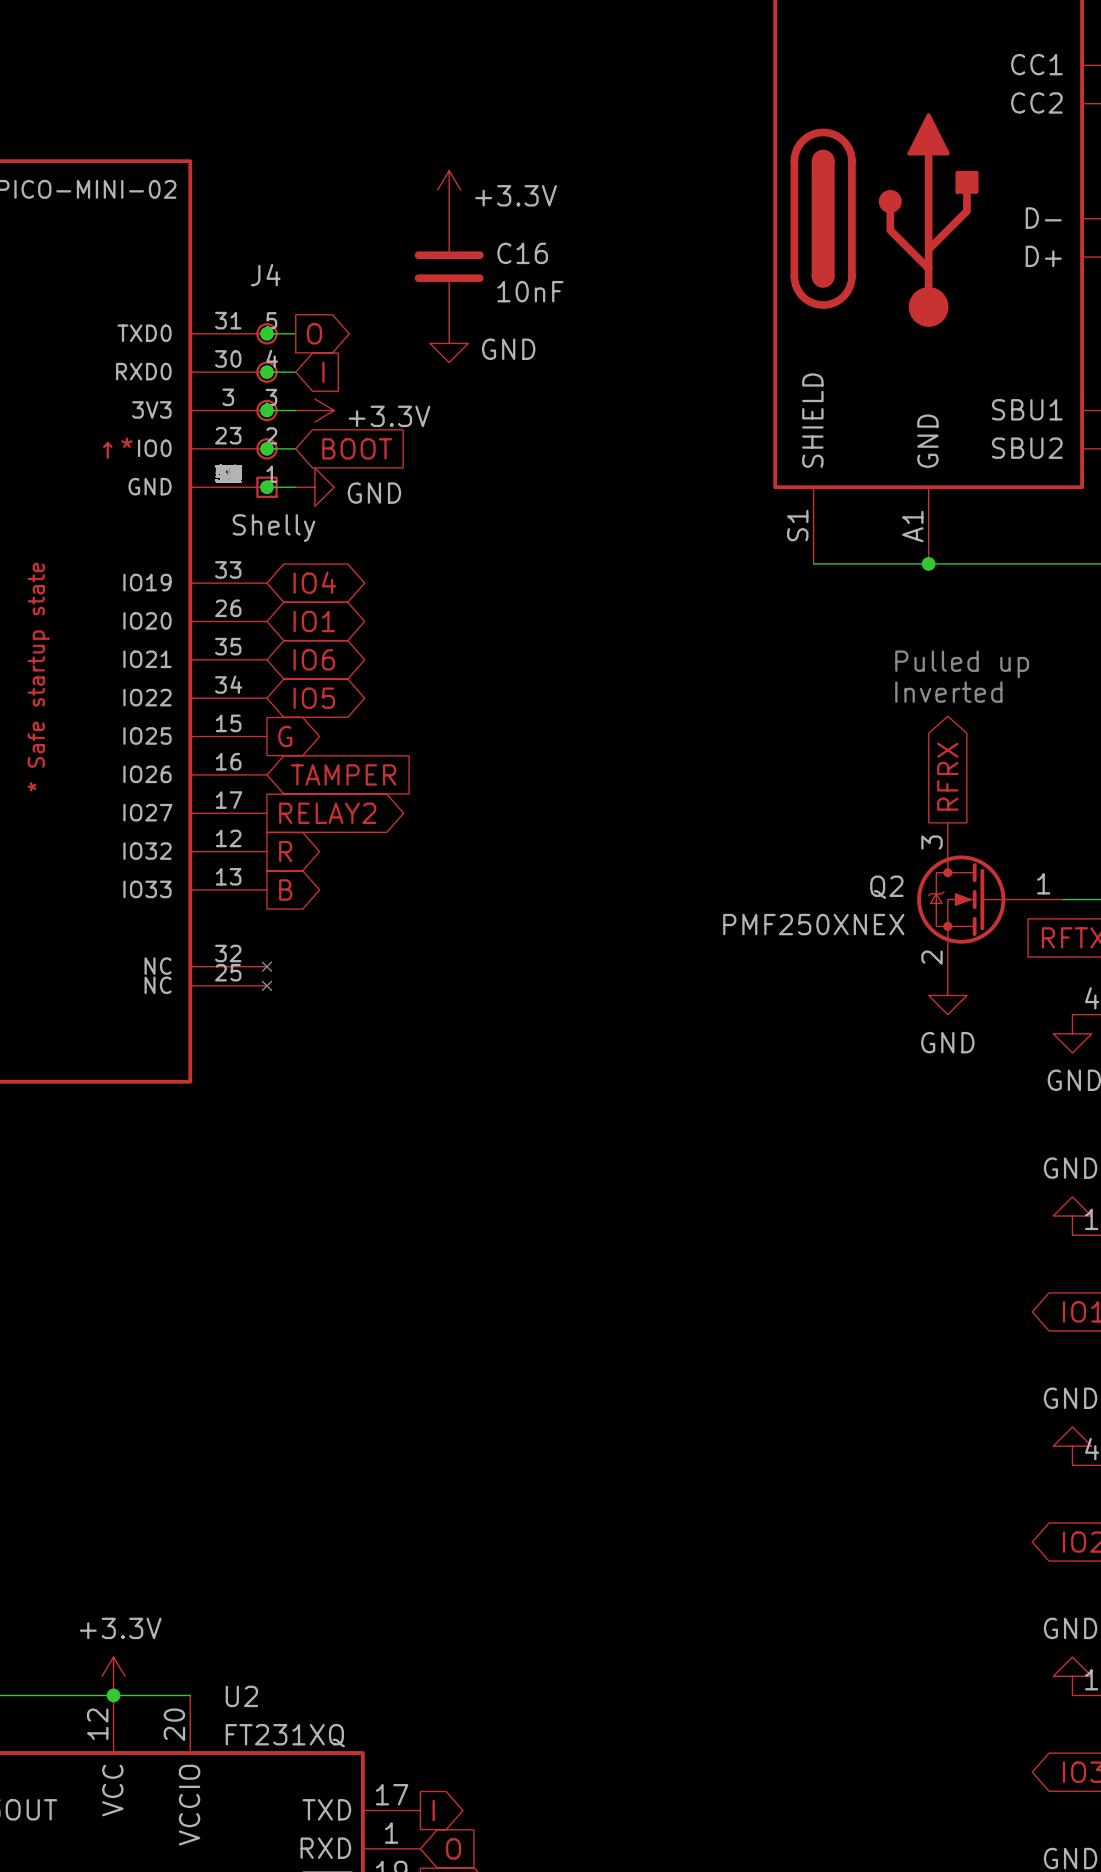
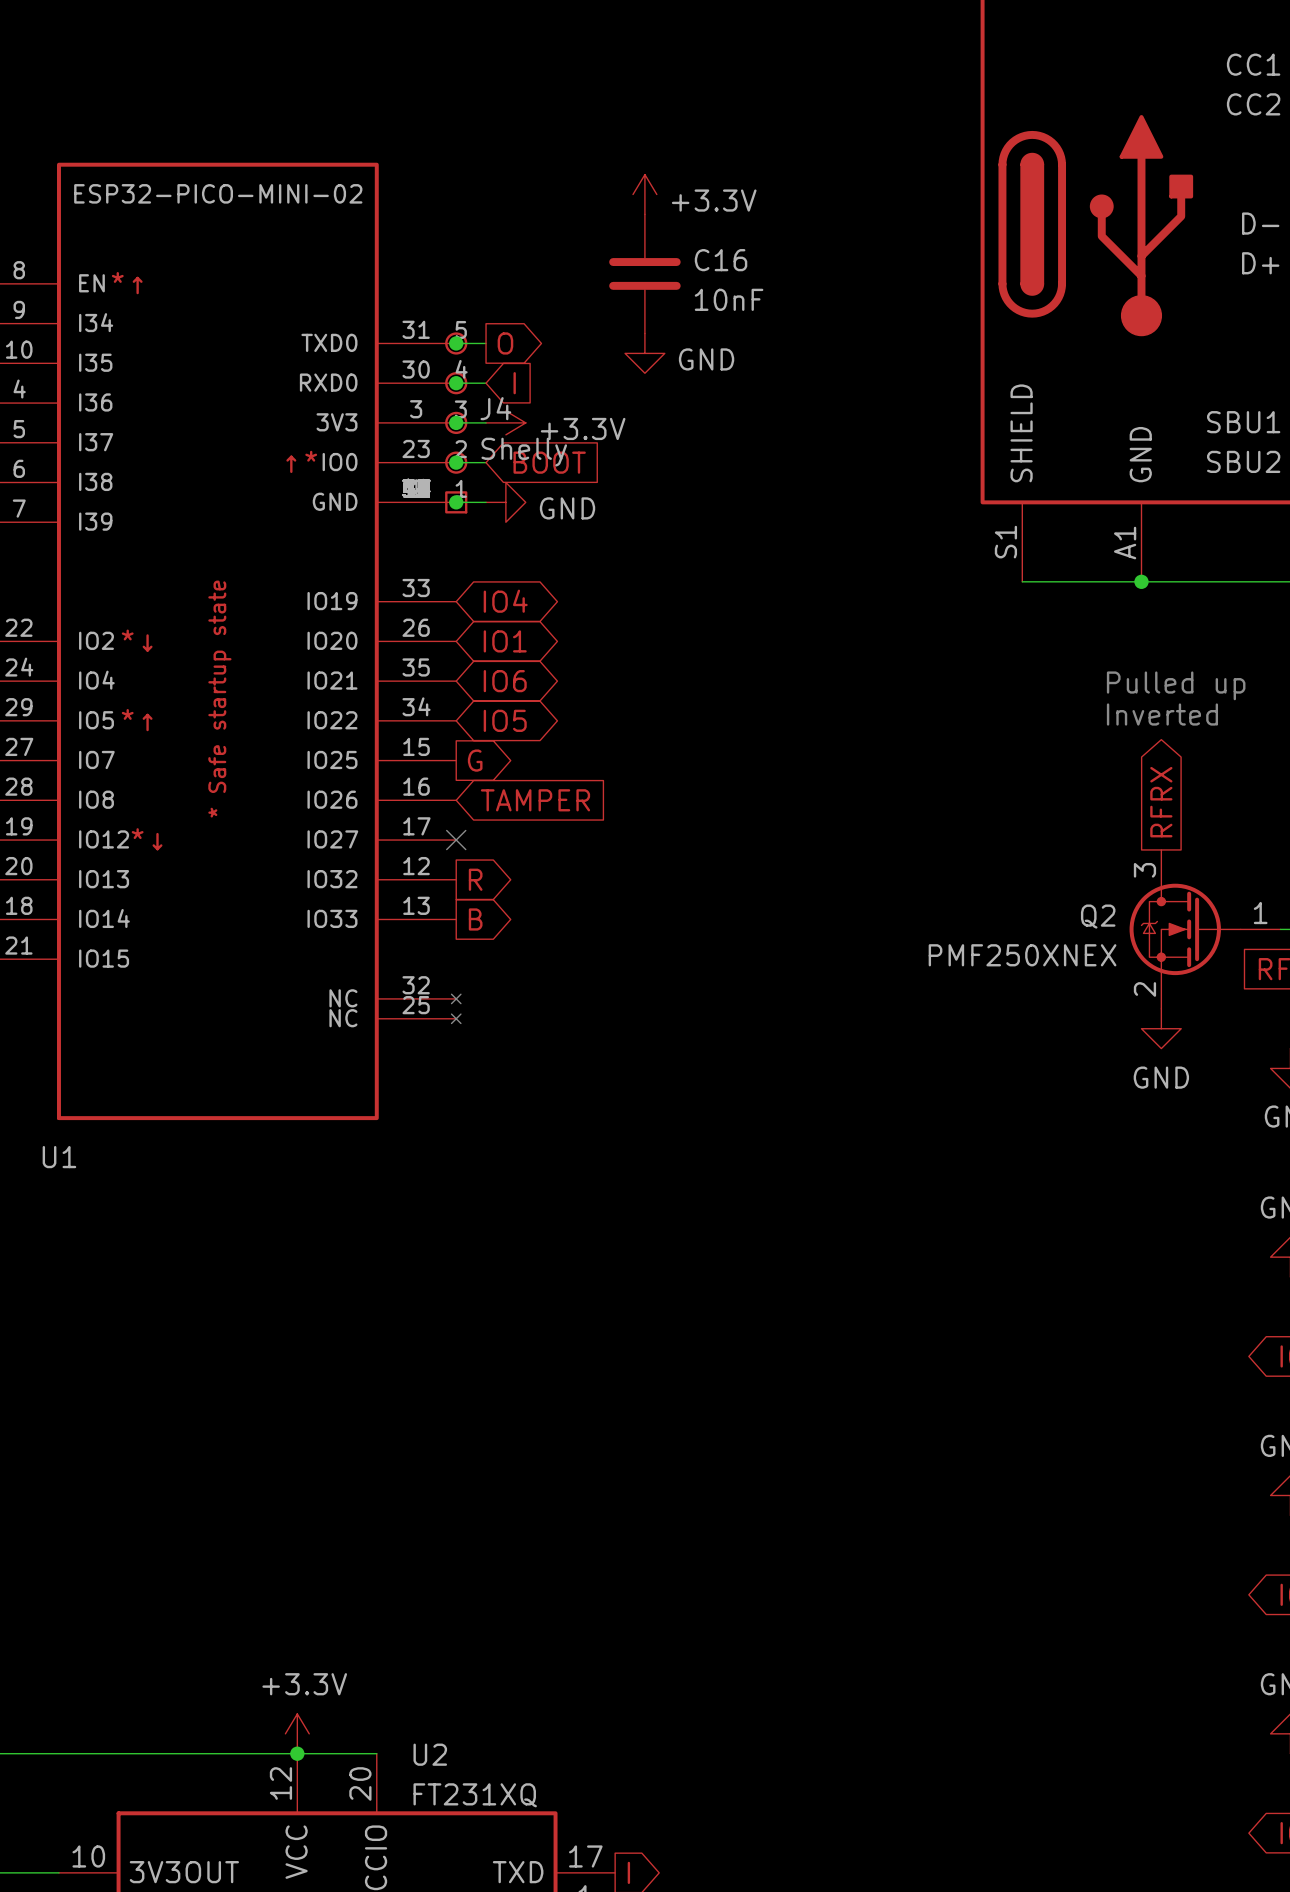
J4 name position: J4 (265, 275) -> J4 (495, 408)
J4 value position: Shelly (273, 528) -> Shelly (524, 452)
no-connect mark: none -> (456, 840)
global label: RELAY2 (327, 813) -> none

